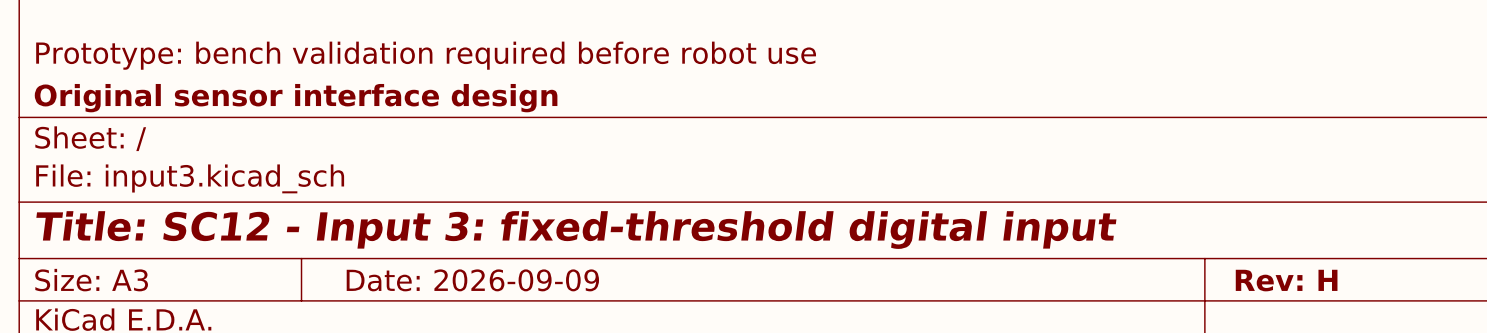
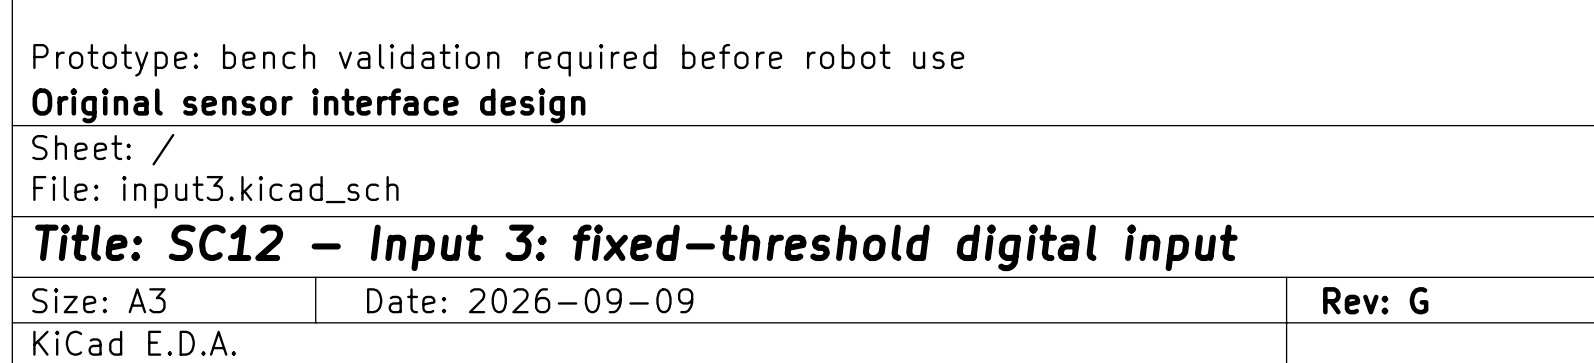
title block: Rev: H (1286, 280) -> Rev: G (1375, 300)

